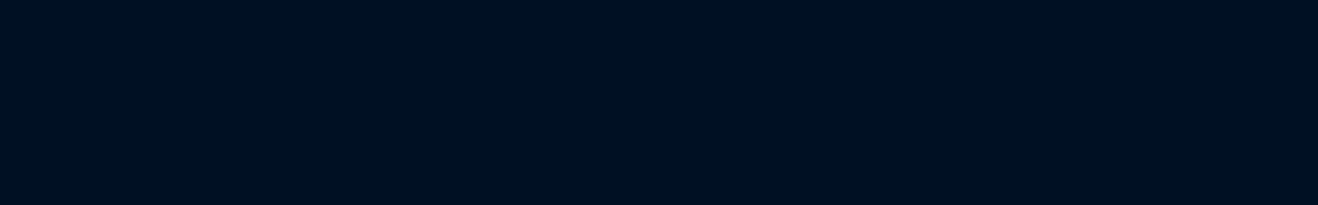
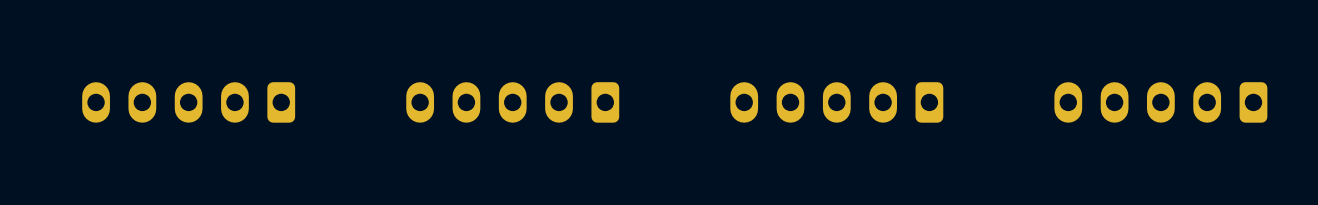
part: none -> (188, 102)
part: none -> (512, 102)
part: none -> (836, 102)
part: none -> (1160, 102)

